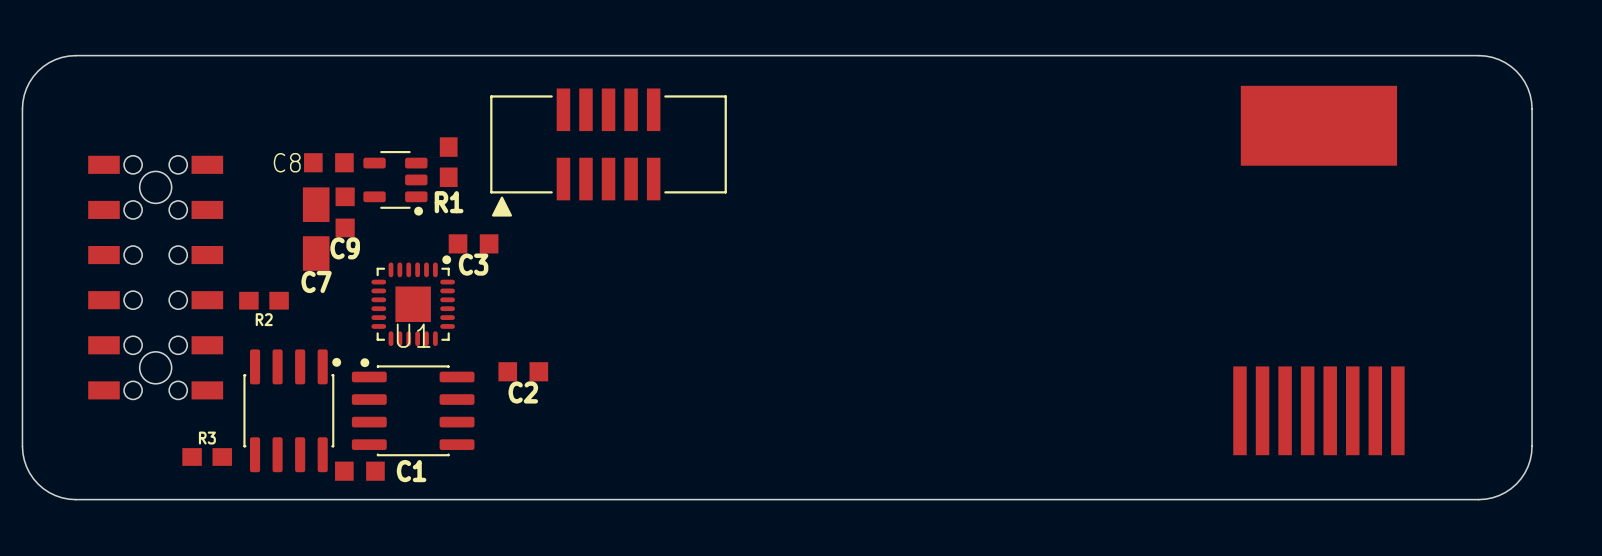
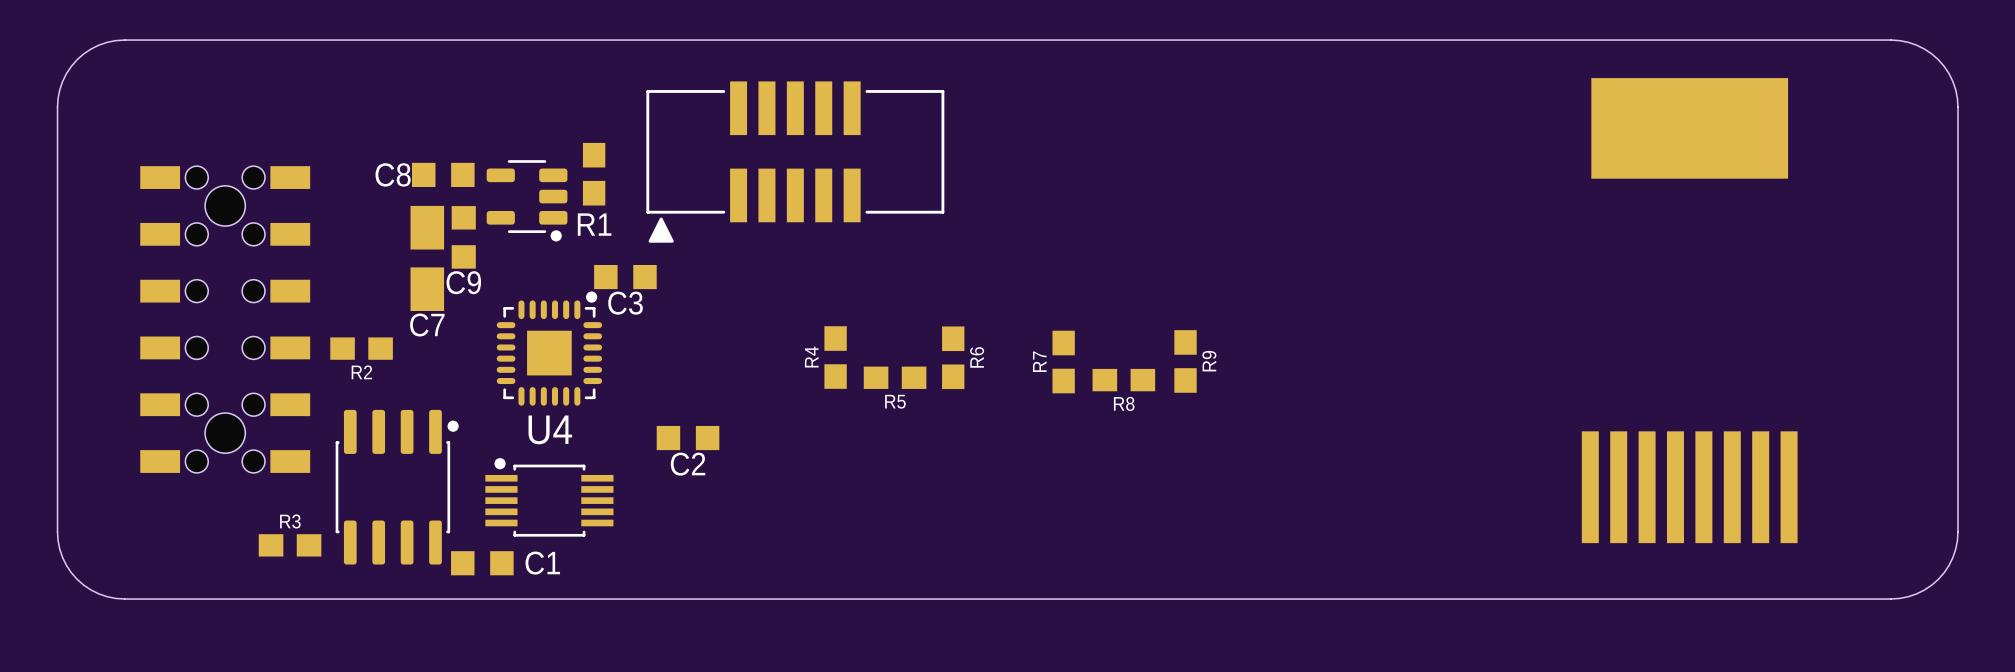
R4: none -> (835, 357)
R6: none -> (953, 357)
R9: none -> (1185, 361)
R7: none -> (1063, 362)
R5: none -> (895, 377)
R8: none -> (1123, 380)
U1: (413, 407) -> none
U4: none -> (549, 497)

